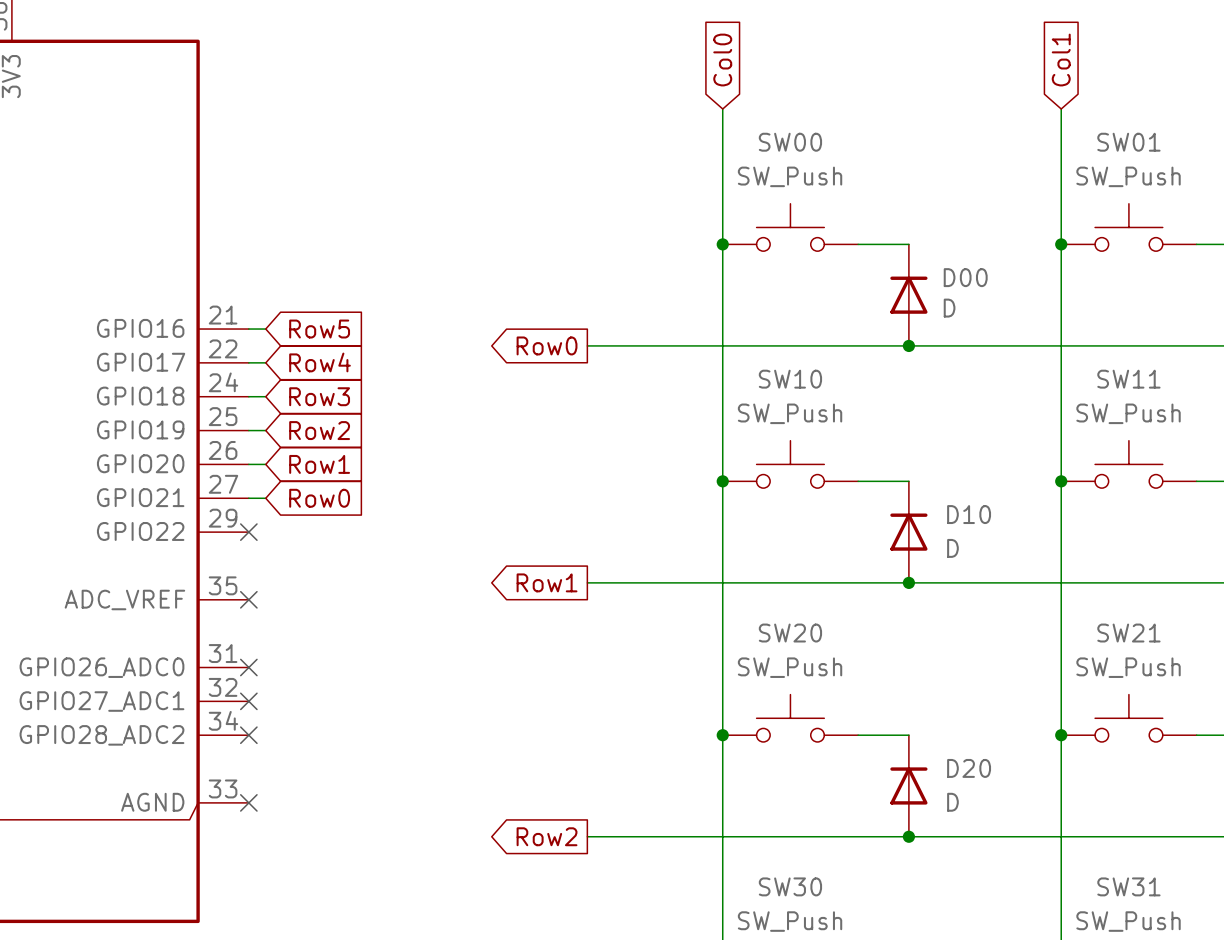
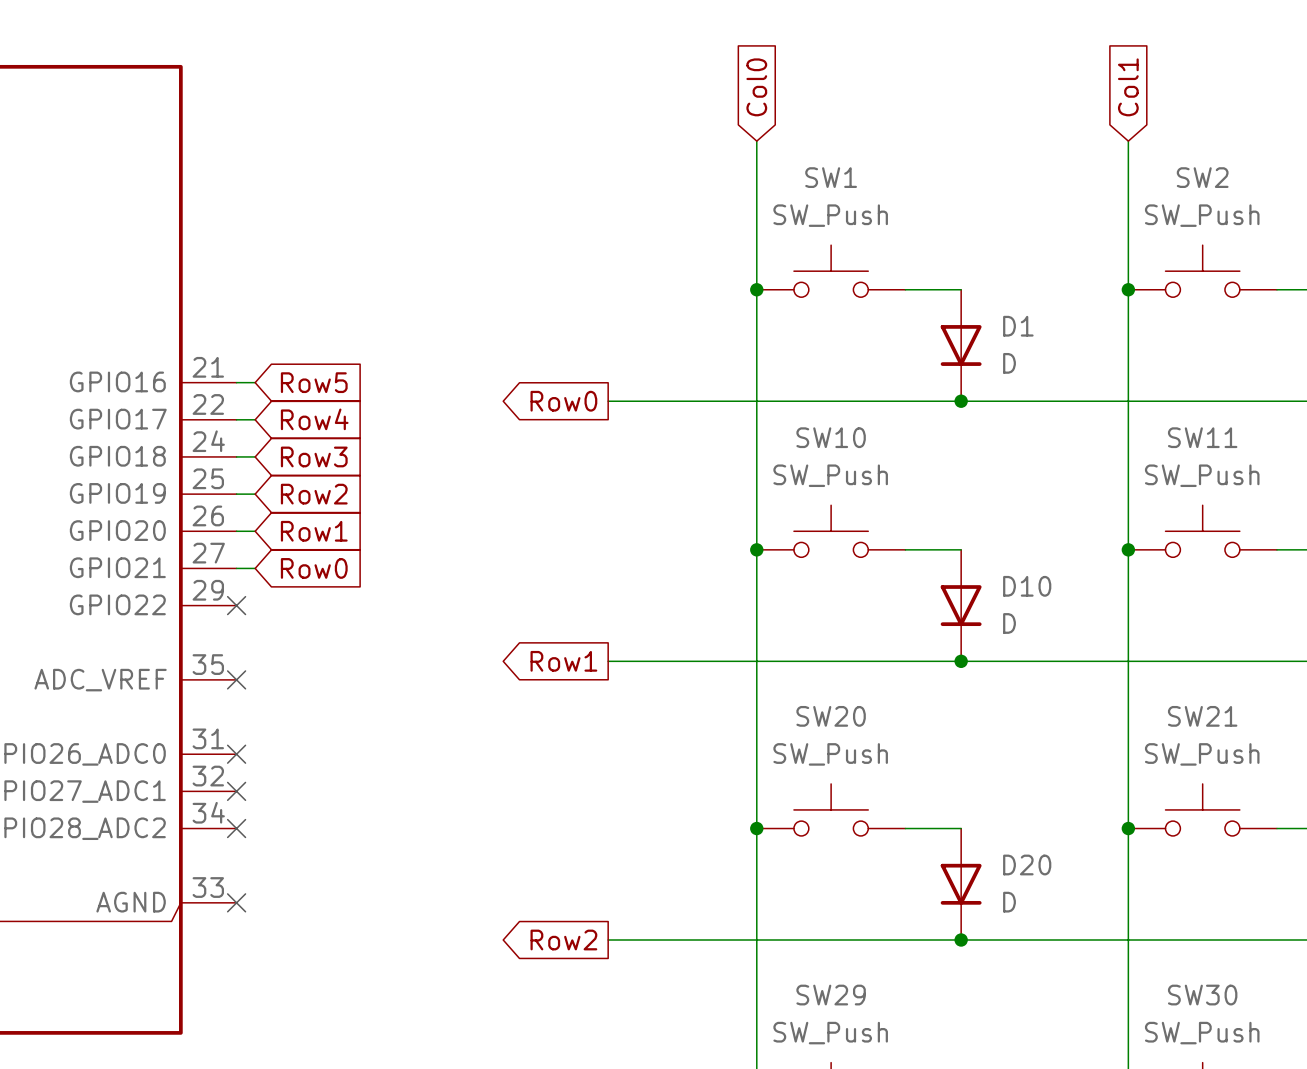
SW00 name: SW00 (790, 142) -> SW1 (831, 177)
SW01 name: SW01 (1128, 142) -> SW2 (1202, 177)
D00: D (908, 295) -> none
D1: none -> D (961, 345)
D10 rotation: 0° (908, 532) -> 180° (961, 605)
D20 rotation: 0° (908, 785) -> 180° (961, 884)
SW30 name: SW30 (790, 886) -> SW29 (831, 995)
SW31 name: SW31 (1128, 886) -> SW30 (1202, 995)

